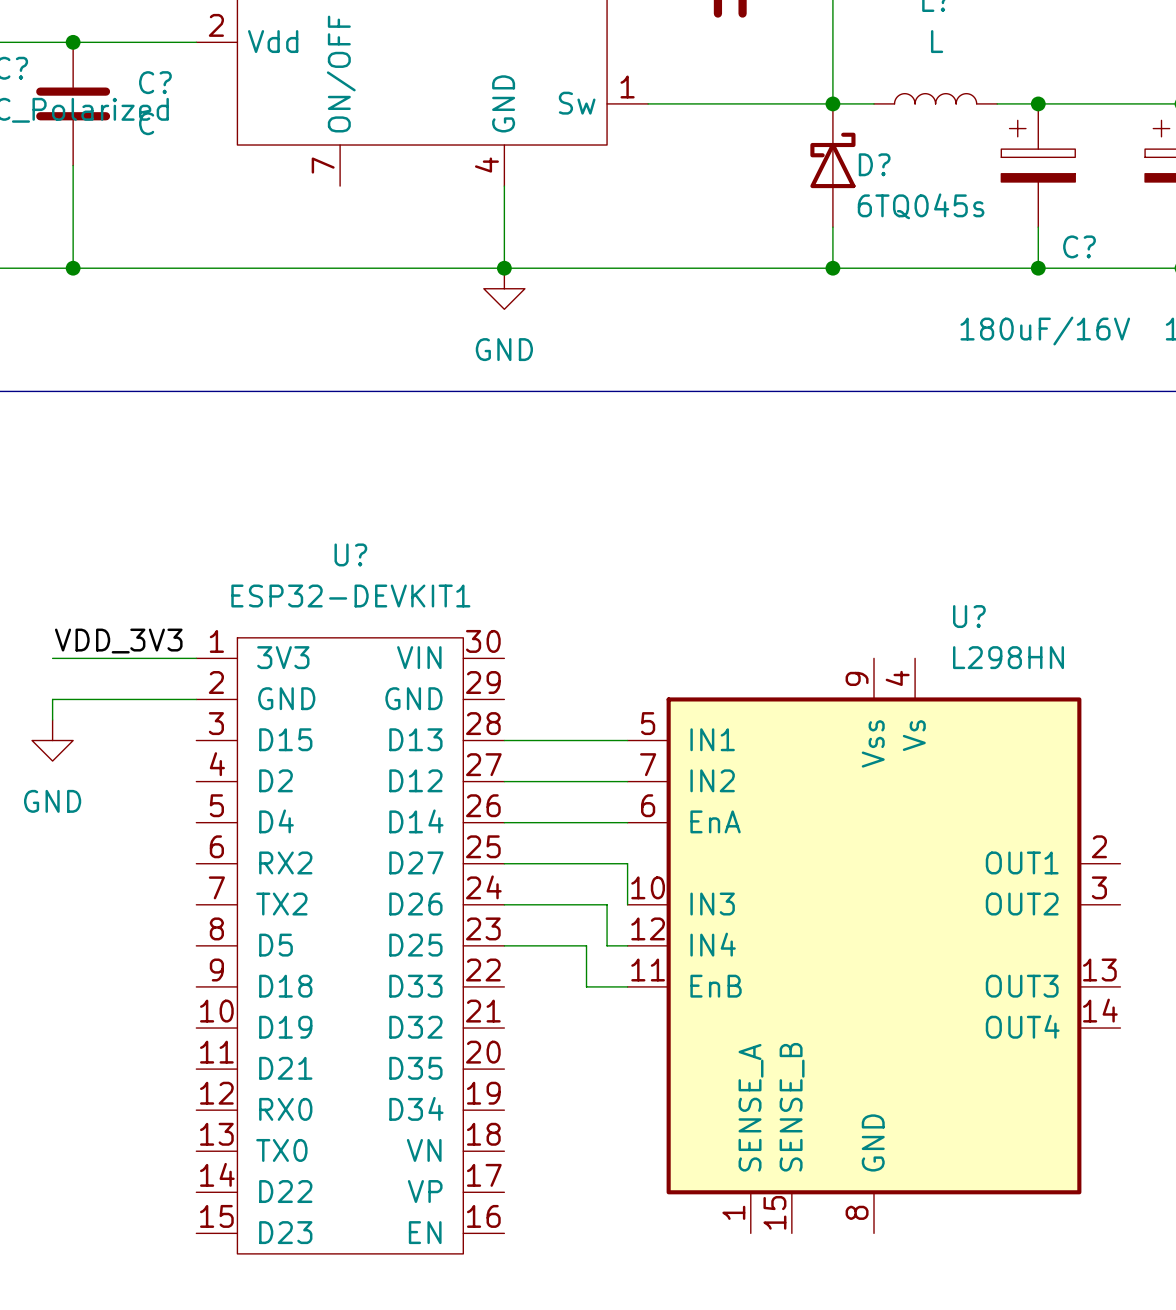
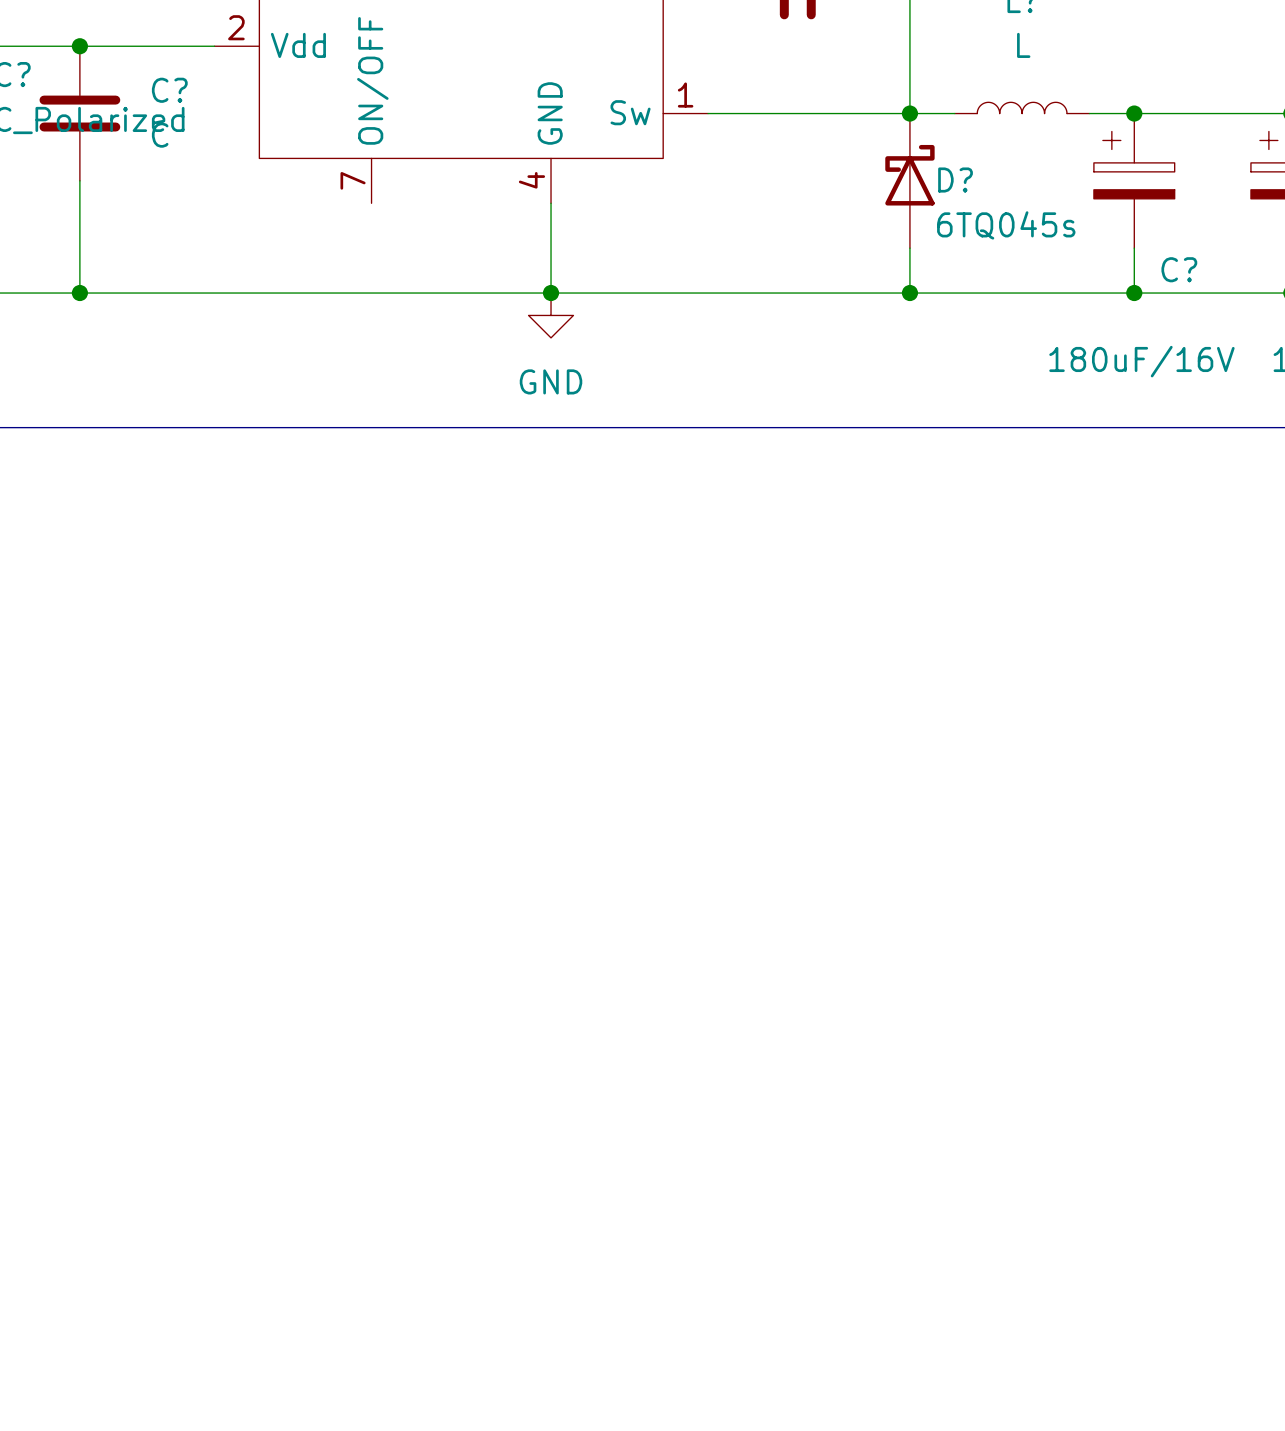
label: VDD_3V3 (118, 641) -> none
wire: (52, 658) (196, 658) -> none
wire: (196, 699) (52, 699) (52, 719) -> none
power symbol: GND (52, 740) -> none
wire: (504, 740) (627, 740) -> none
wire: (504, 781) (627, 781) -> none
wire: (504, 822) (627, 822) -> none
wire: (504, 863) (627, 863) (627, 904) -> none
wire: (504, 904) (607, 904) (607, 945) (627, 945) -> none
U?: ESP32-DEVKIT1 (350, 945) -> none
wire: (504, 945) (586, 945) (586, 986) (627, 986) -> none
U?: L298HN (874, 945) -> none

